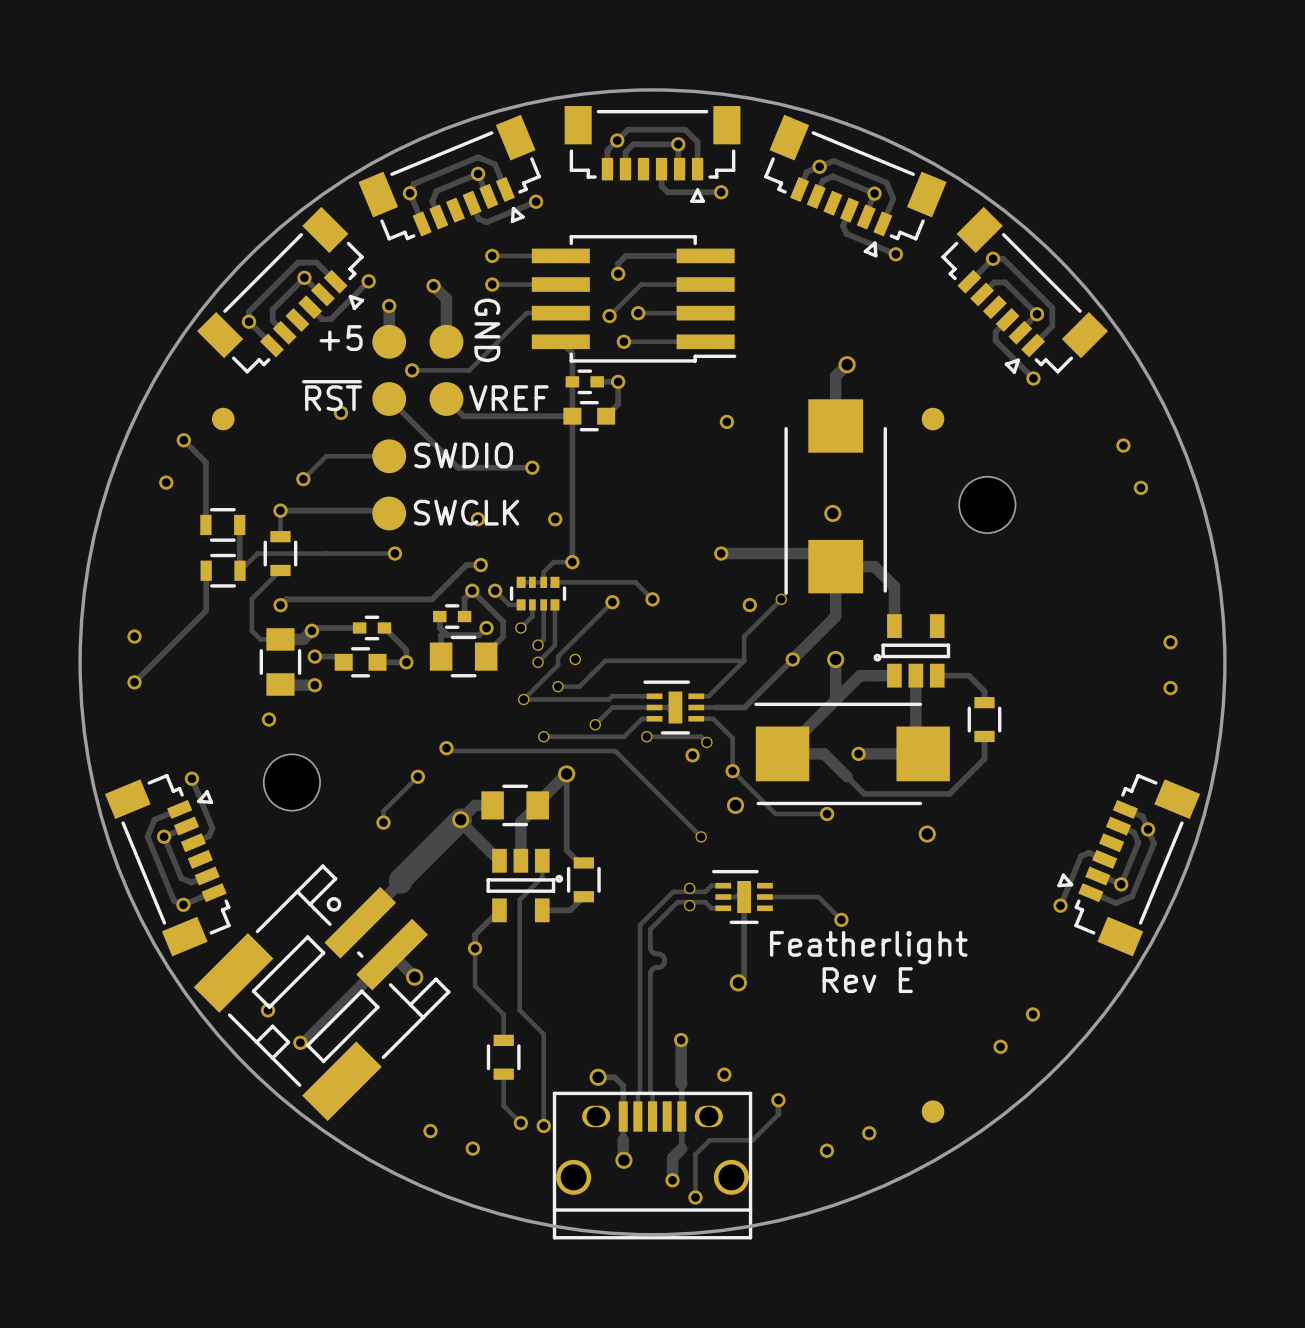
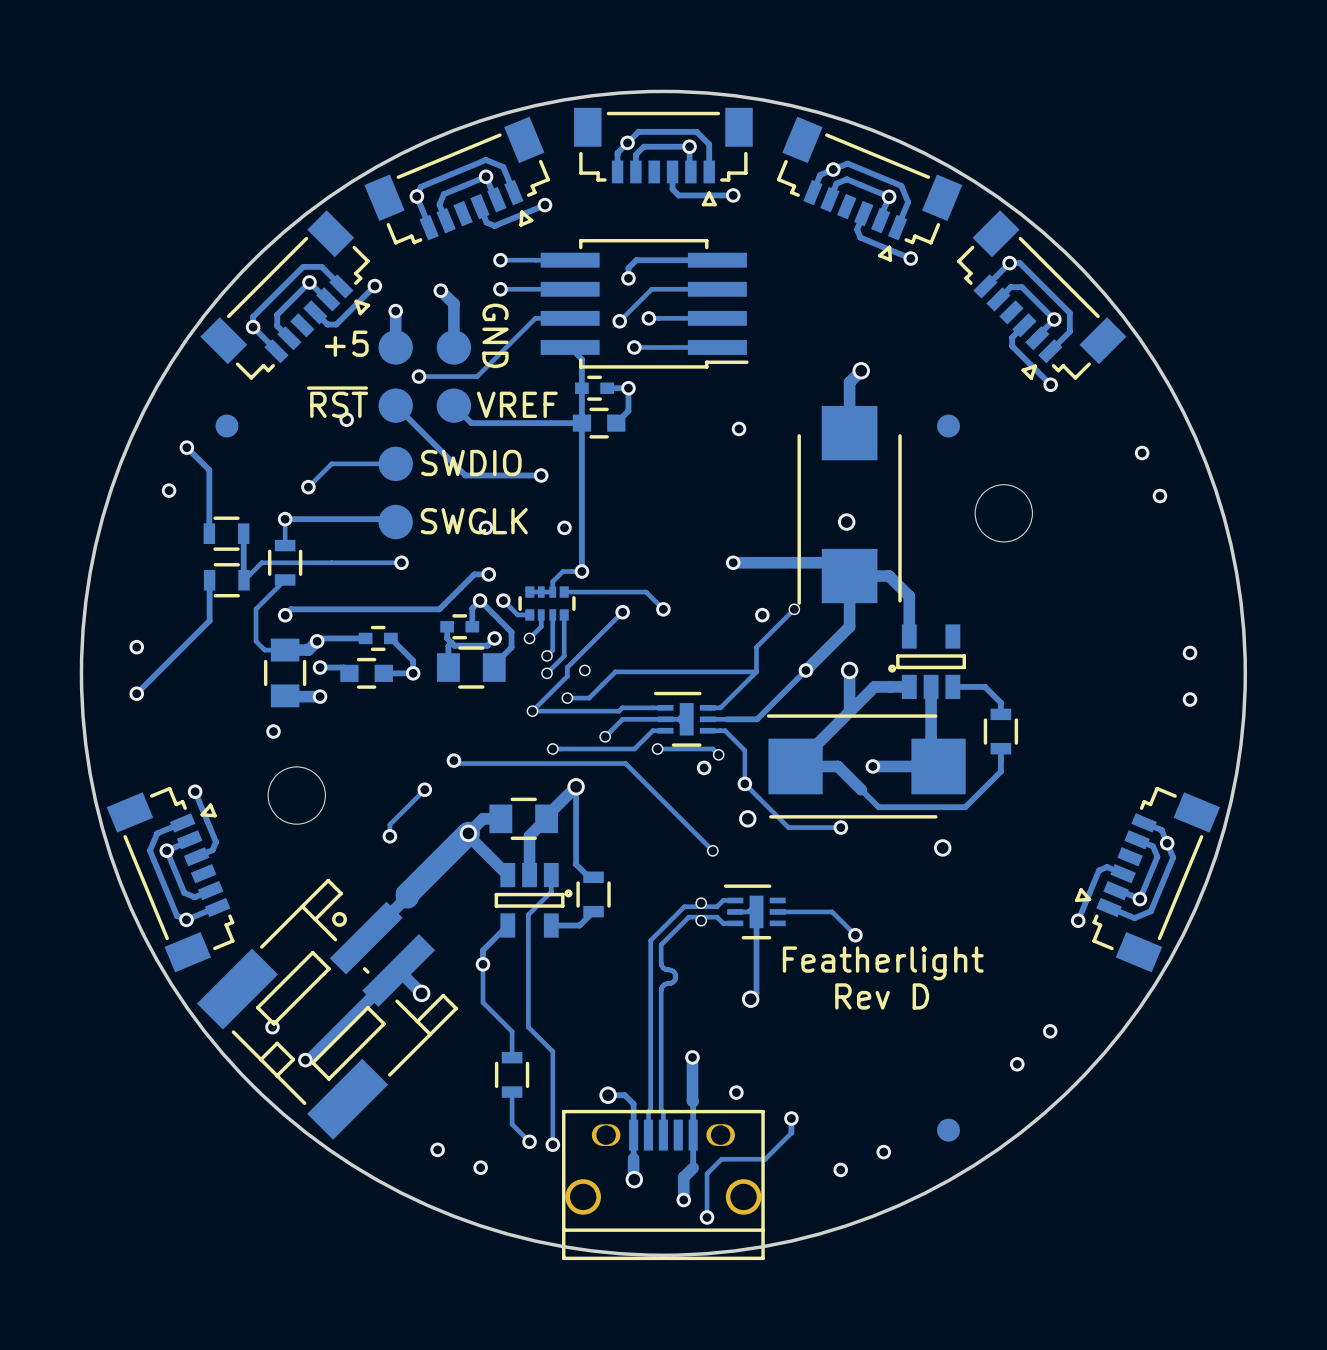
text: Rev E (867, 980) -> Rev D (882, 996)

